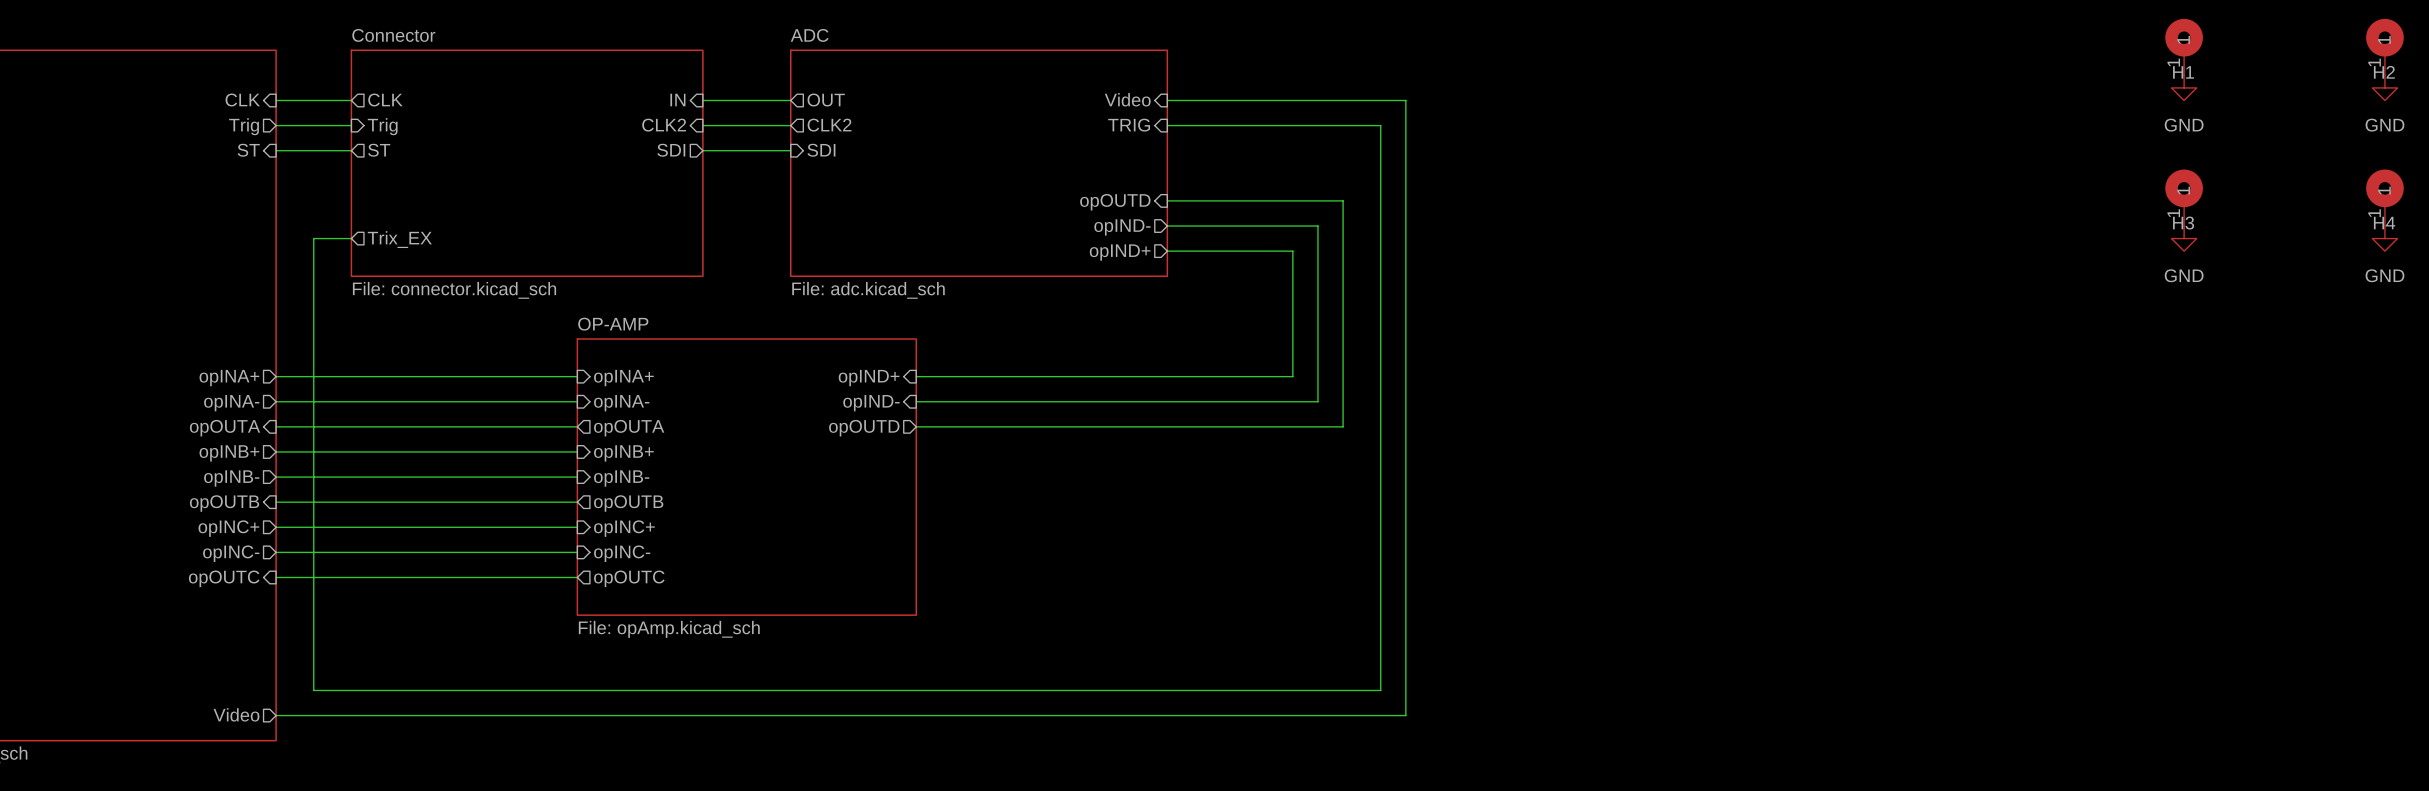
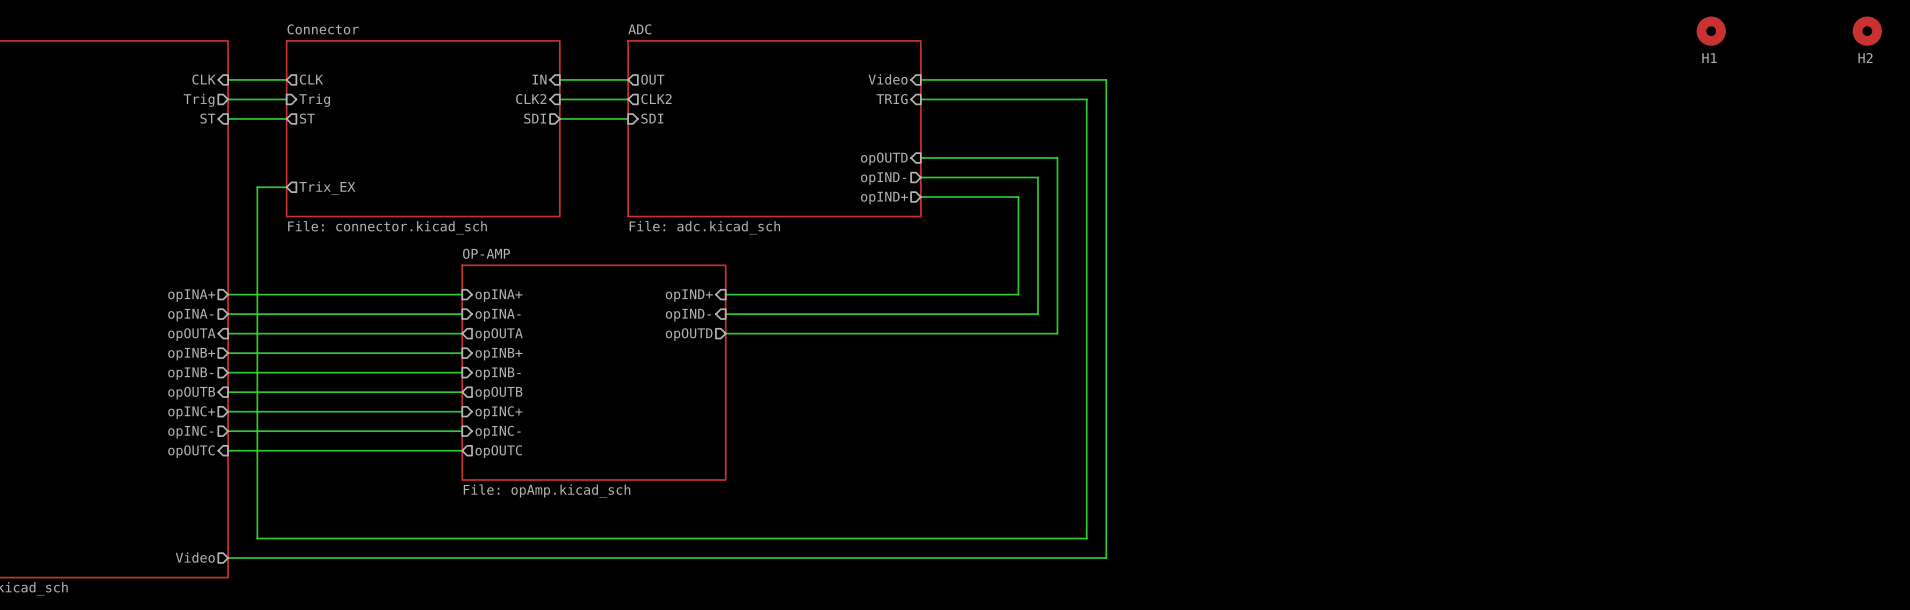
H1 symbol: [2165, 18, 2203, 76] -> [1696, 16, 1726, 46]
H2 symbol: [2366, 18, 2404, 76] -> [1852, 16, 1882, 46]
power symbol: GND (2184, 87) -> none
power symbol: GND (2384, 87) -> none
H3: (2184, 197) -> none
H4: (2384, 197) -> none
power symbol: GND (2184, 238) -> none
power symbol: GND (2384, 238) -> none

